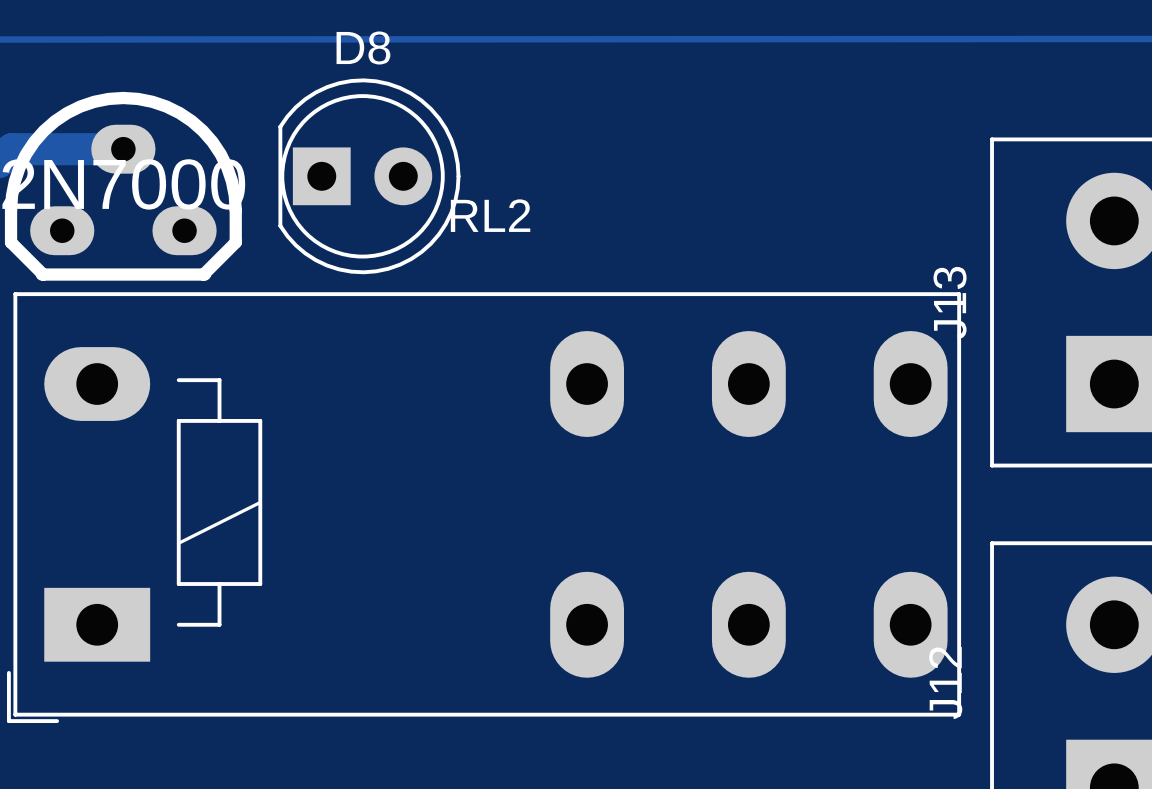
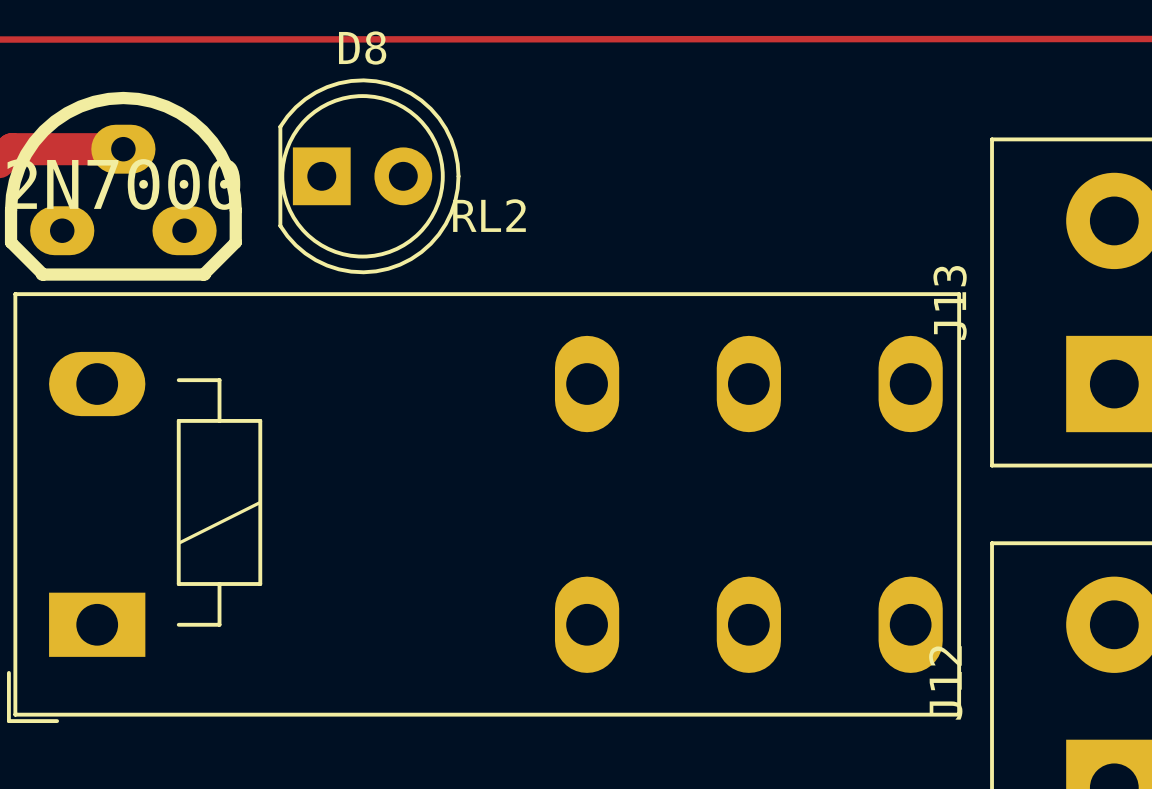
RL2 footprint: [7, 292, 962, 724] -> [7, 292, 962, 724]

